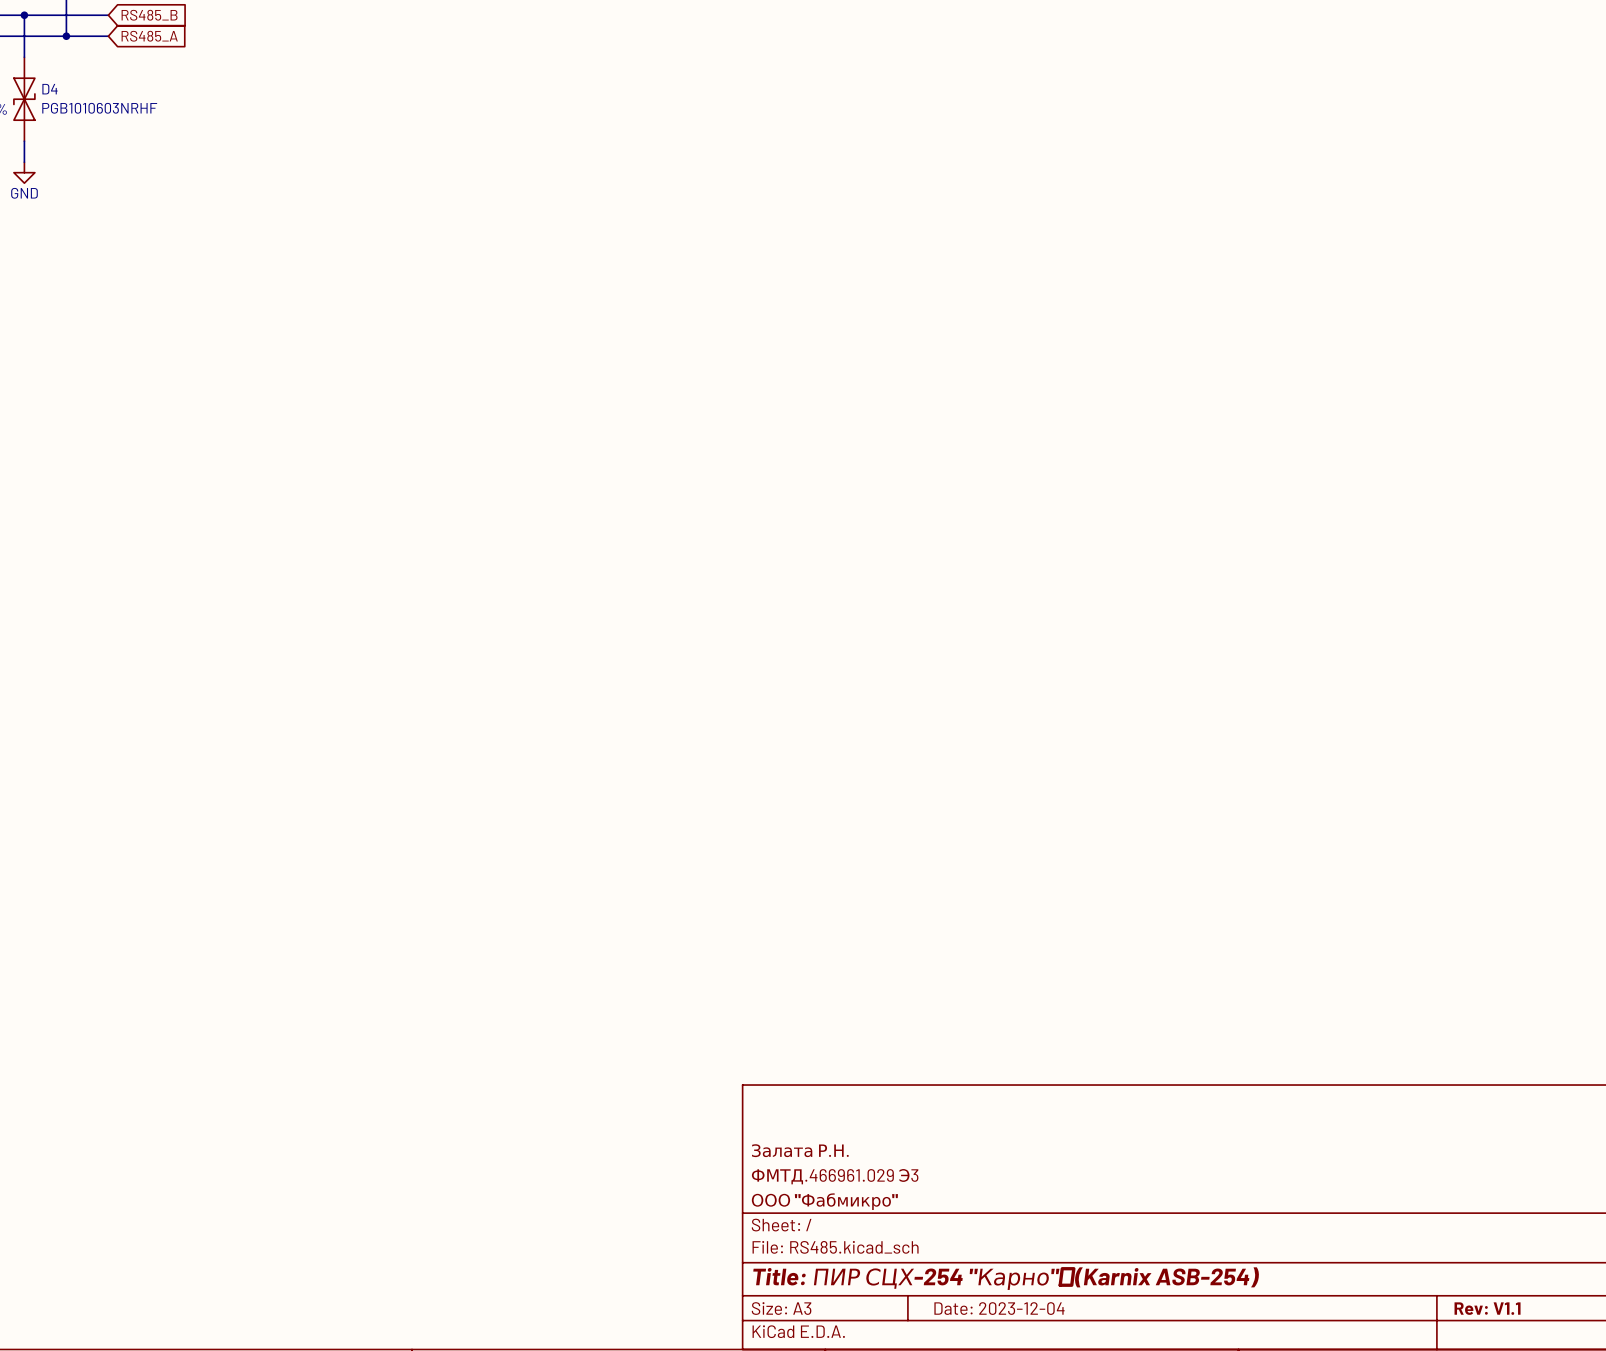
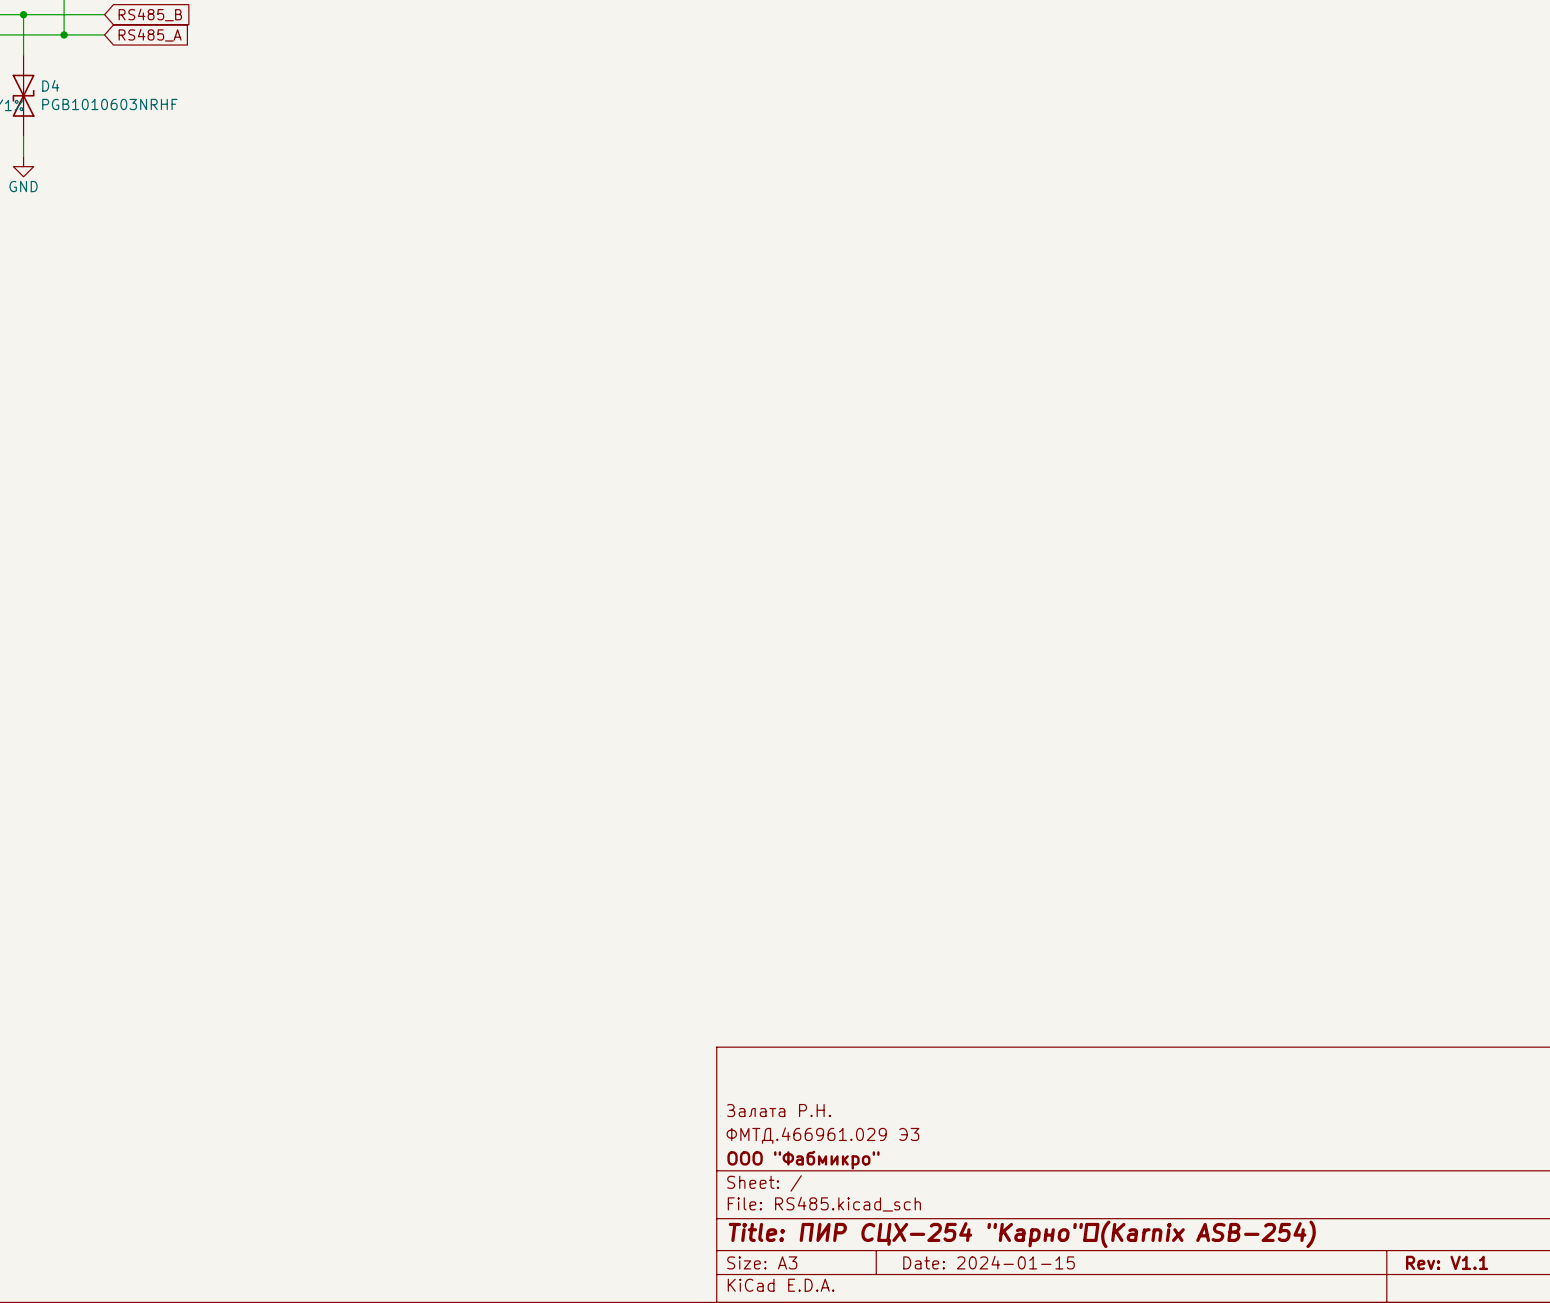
title block: Date: 2023-12-04 (999, 1308) -> Date: 2024-01-15 (989, 1262)

